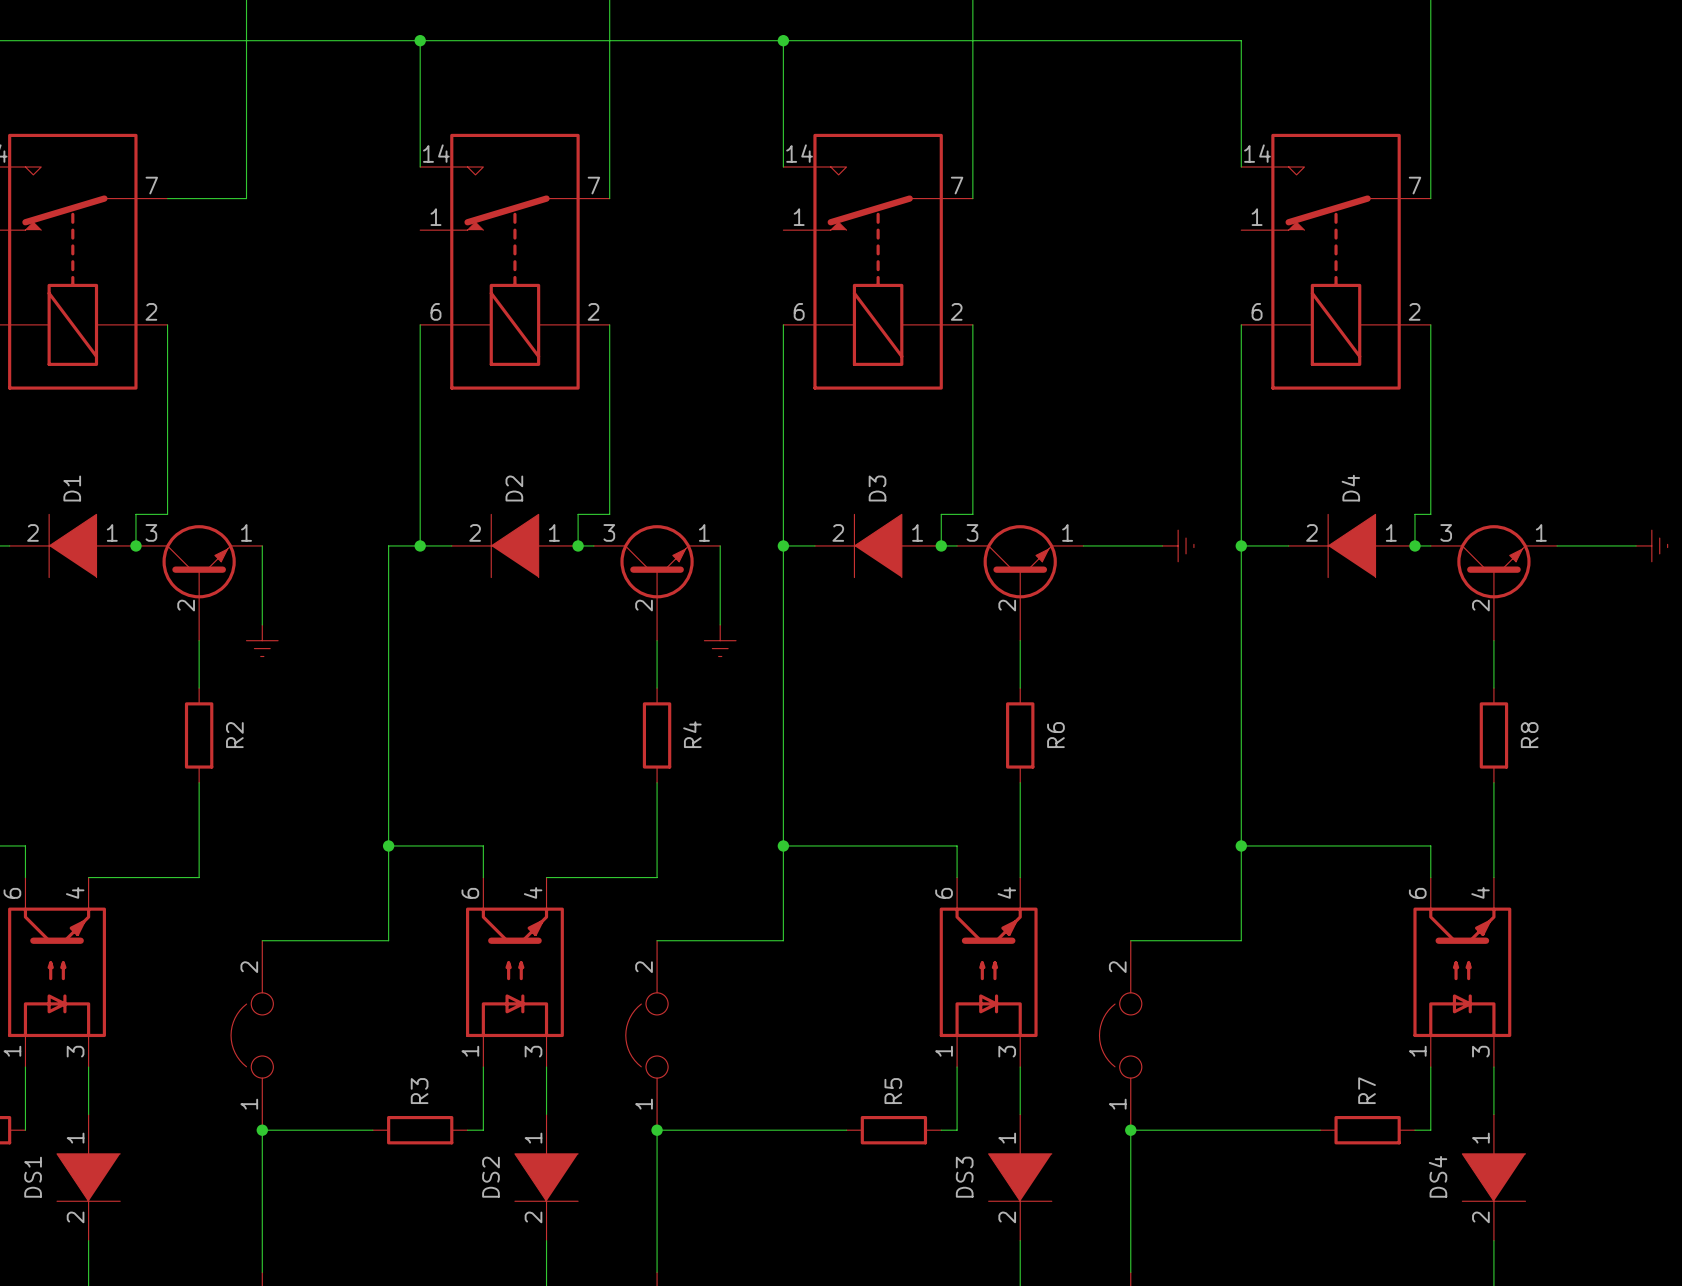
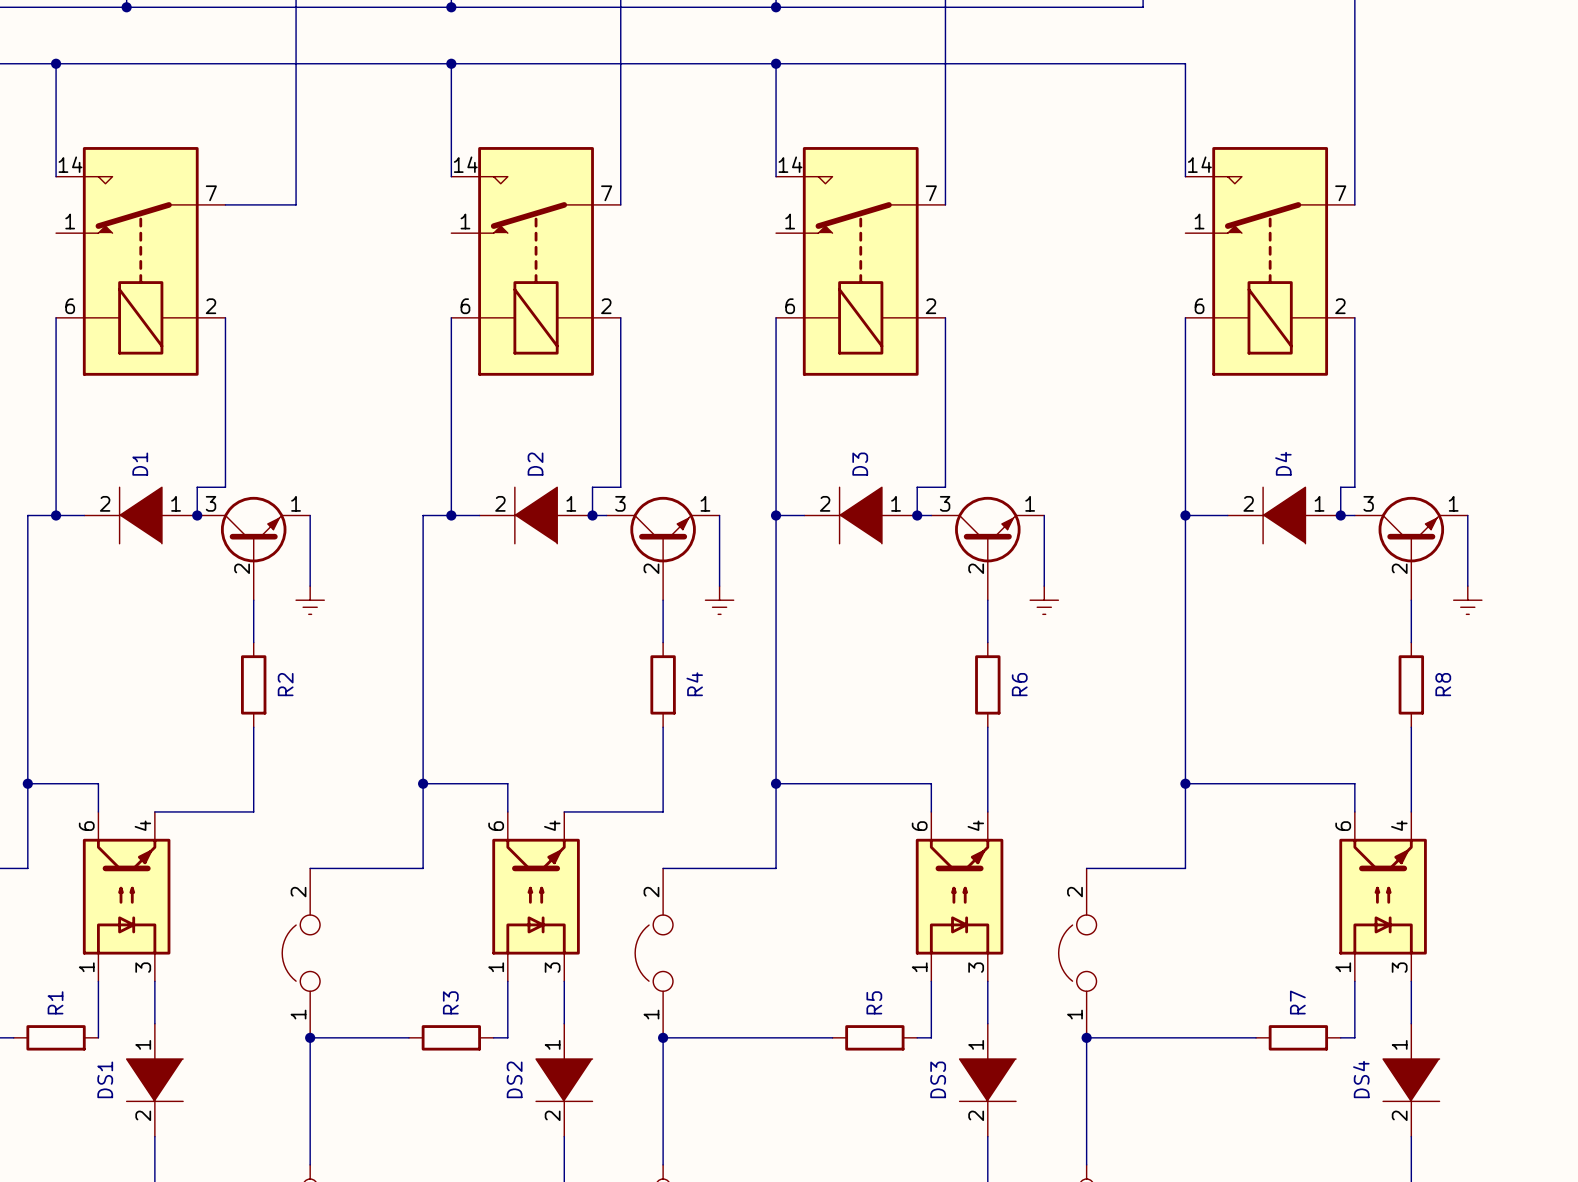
wire: (1083, 545) (1162, 545) -> (1044, 515) (1044, 586)
power symbol rotation: 0° (1178, 545) -> 90° clockwise (1044, 600)
power symbol position: (1178, 545) -> (1044, 600)
wire: (1557, 545) (1636, 545) -> (1467, 515) (1467, 586)
power symbol rotation: 0° (1651, 545) -> 90° clockwise (1467, 600)
power symbol position: (1651, 545) -> (1467, 600)

